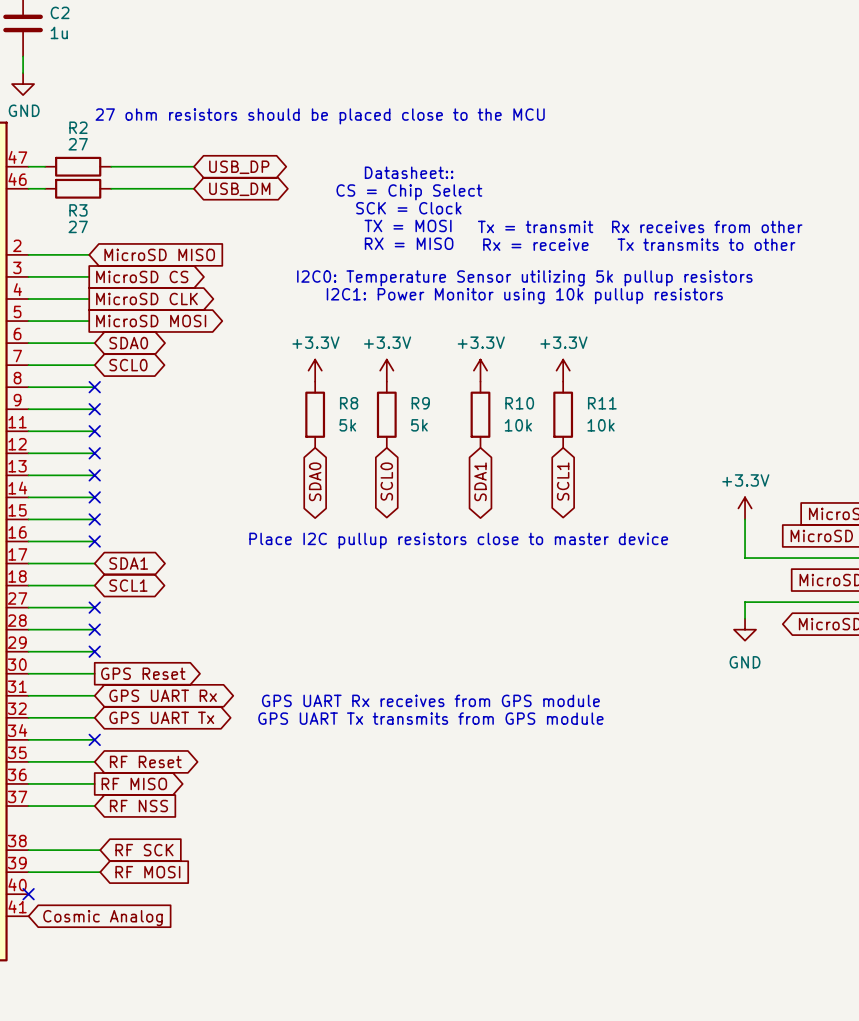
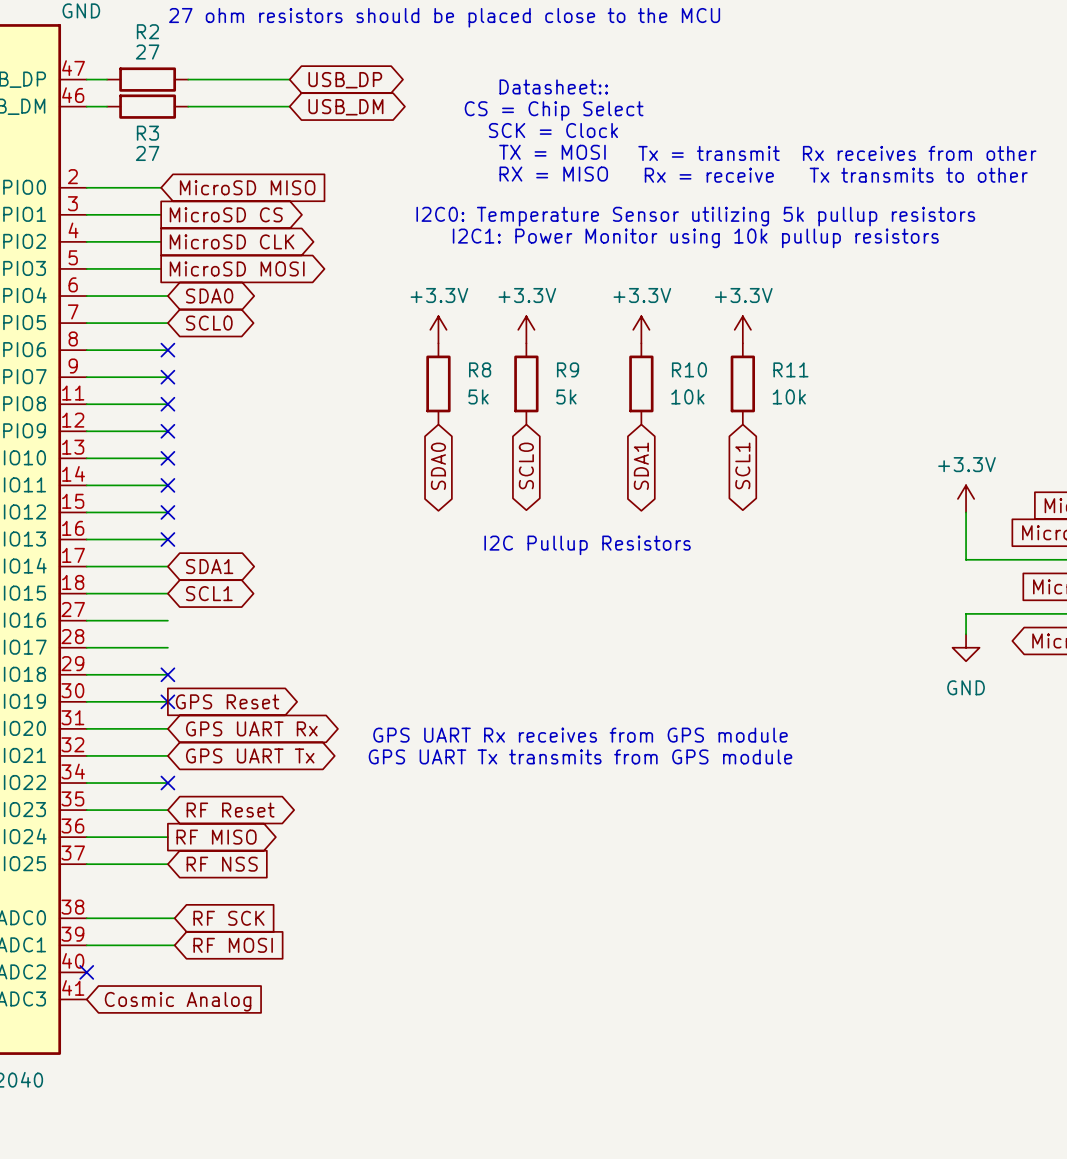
text: Place I2C pullup resistors close to master device (458, 540) -> none
text: none -> I2C Pullup Resistors (587, 545)
no-connect mark: (94, 607) -> none
no-connect mark: (94, 629) -> none
no-connect mark: none -> (167, 701)

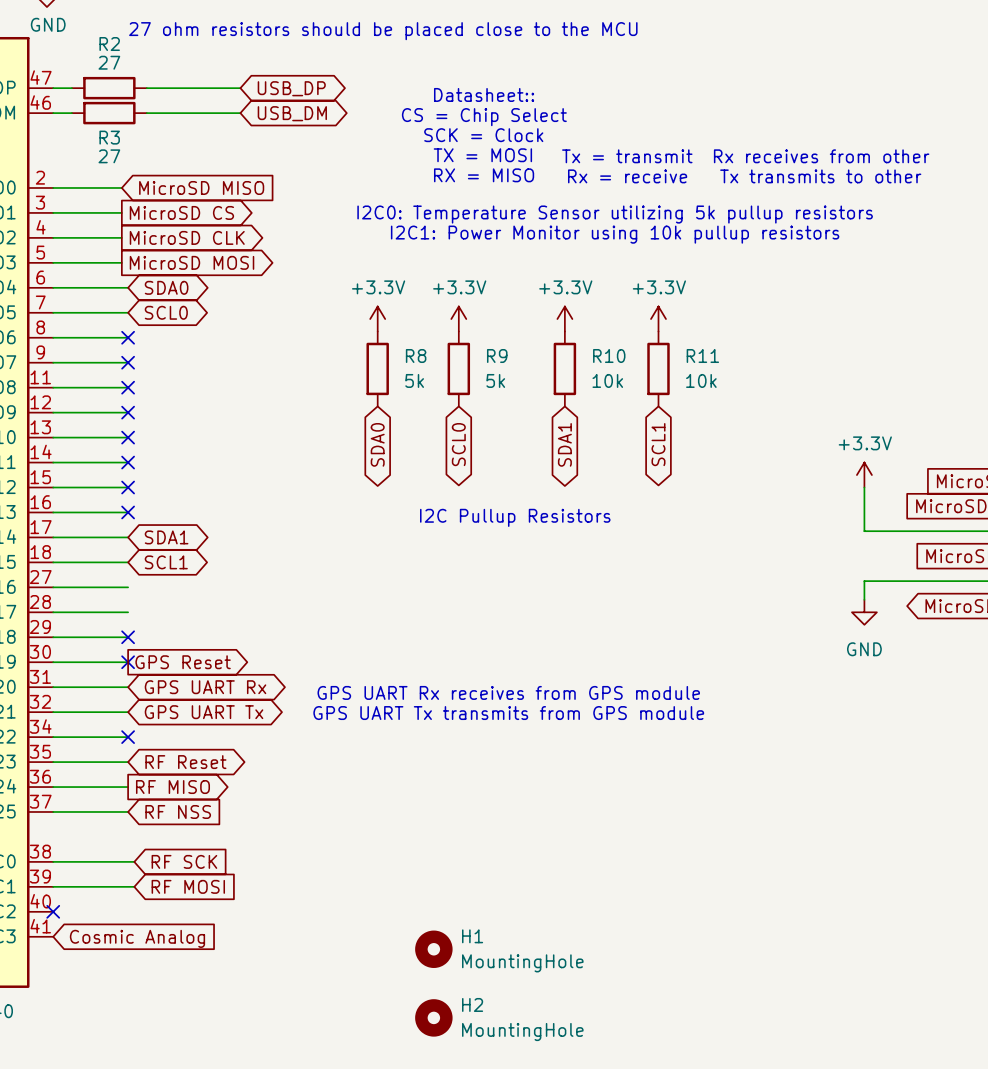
H1: none -> MountingHole (433, 949)
H2: none -> MountingHole (433, 1017)

